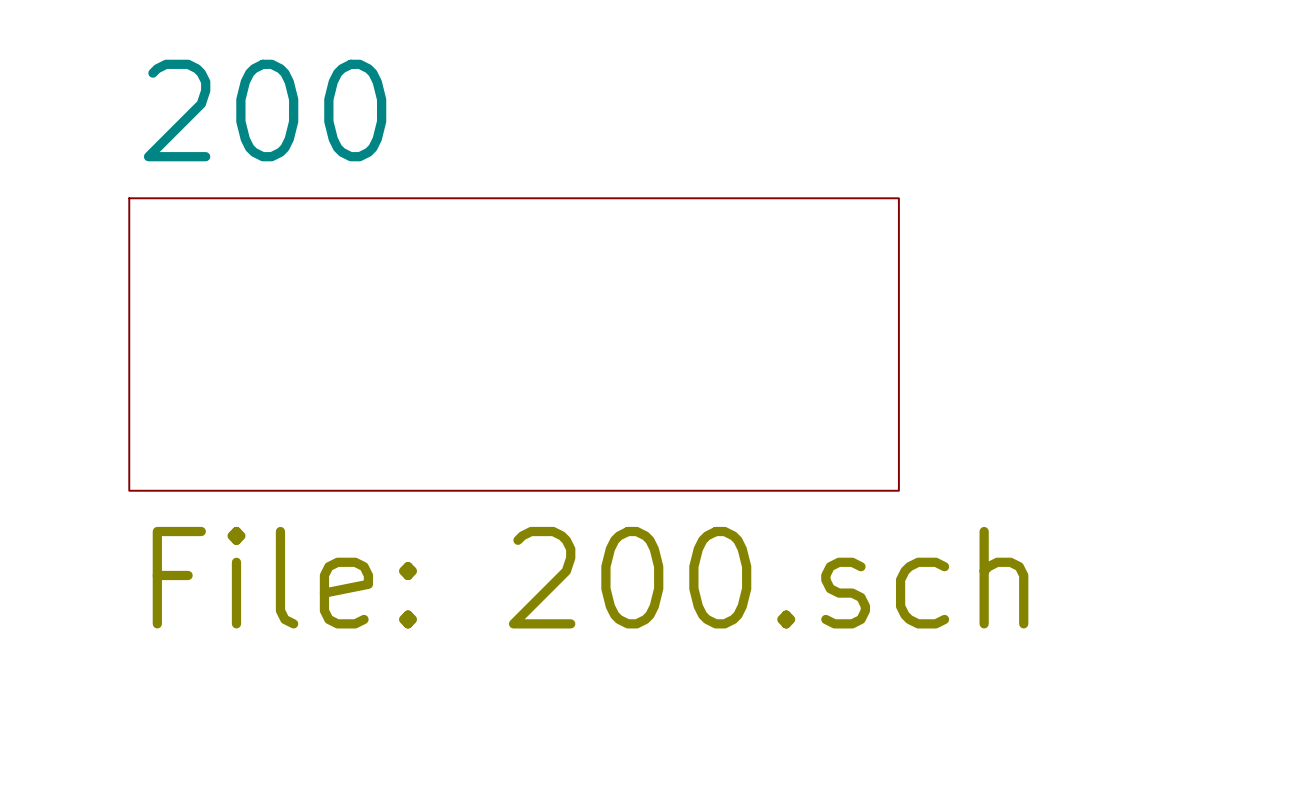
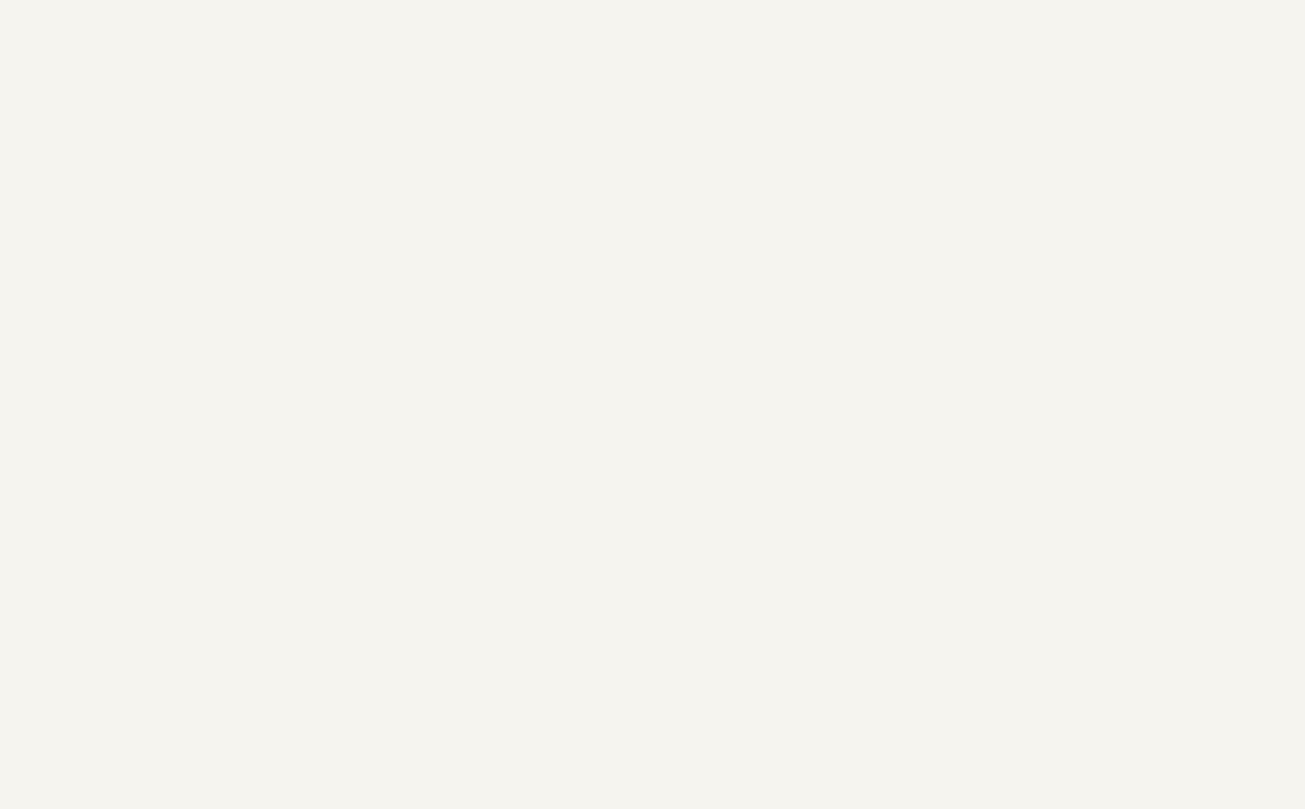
sheet 200: File: 200.sch (514, 344) -> none

